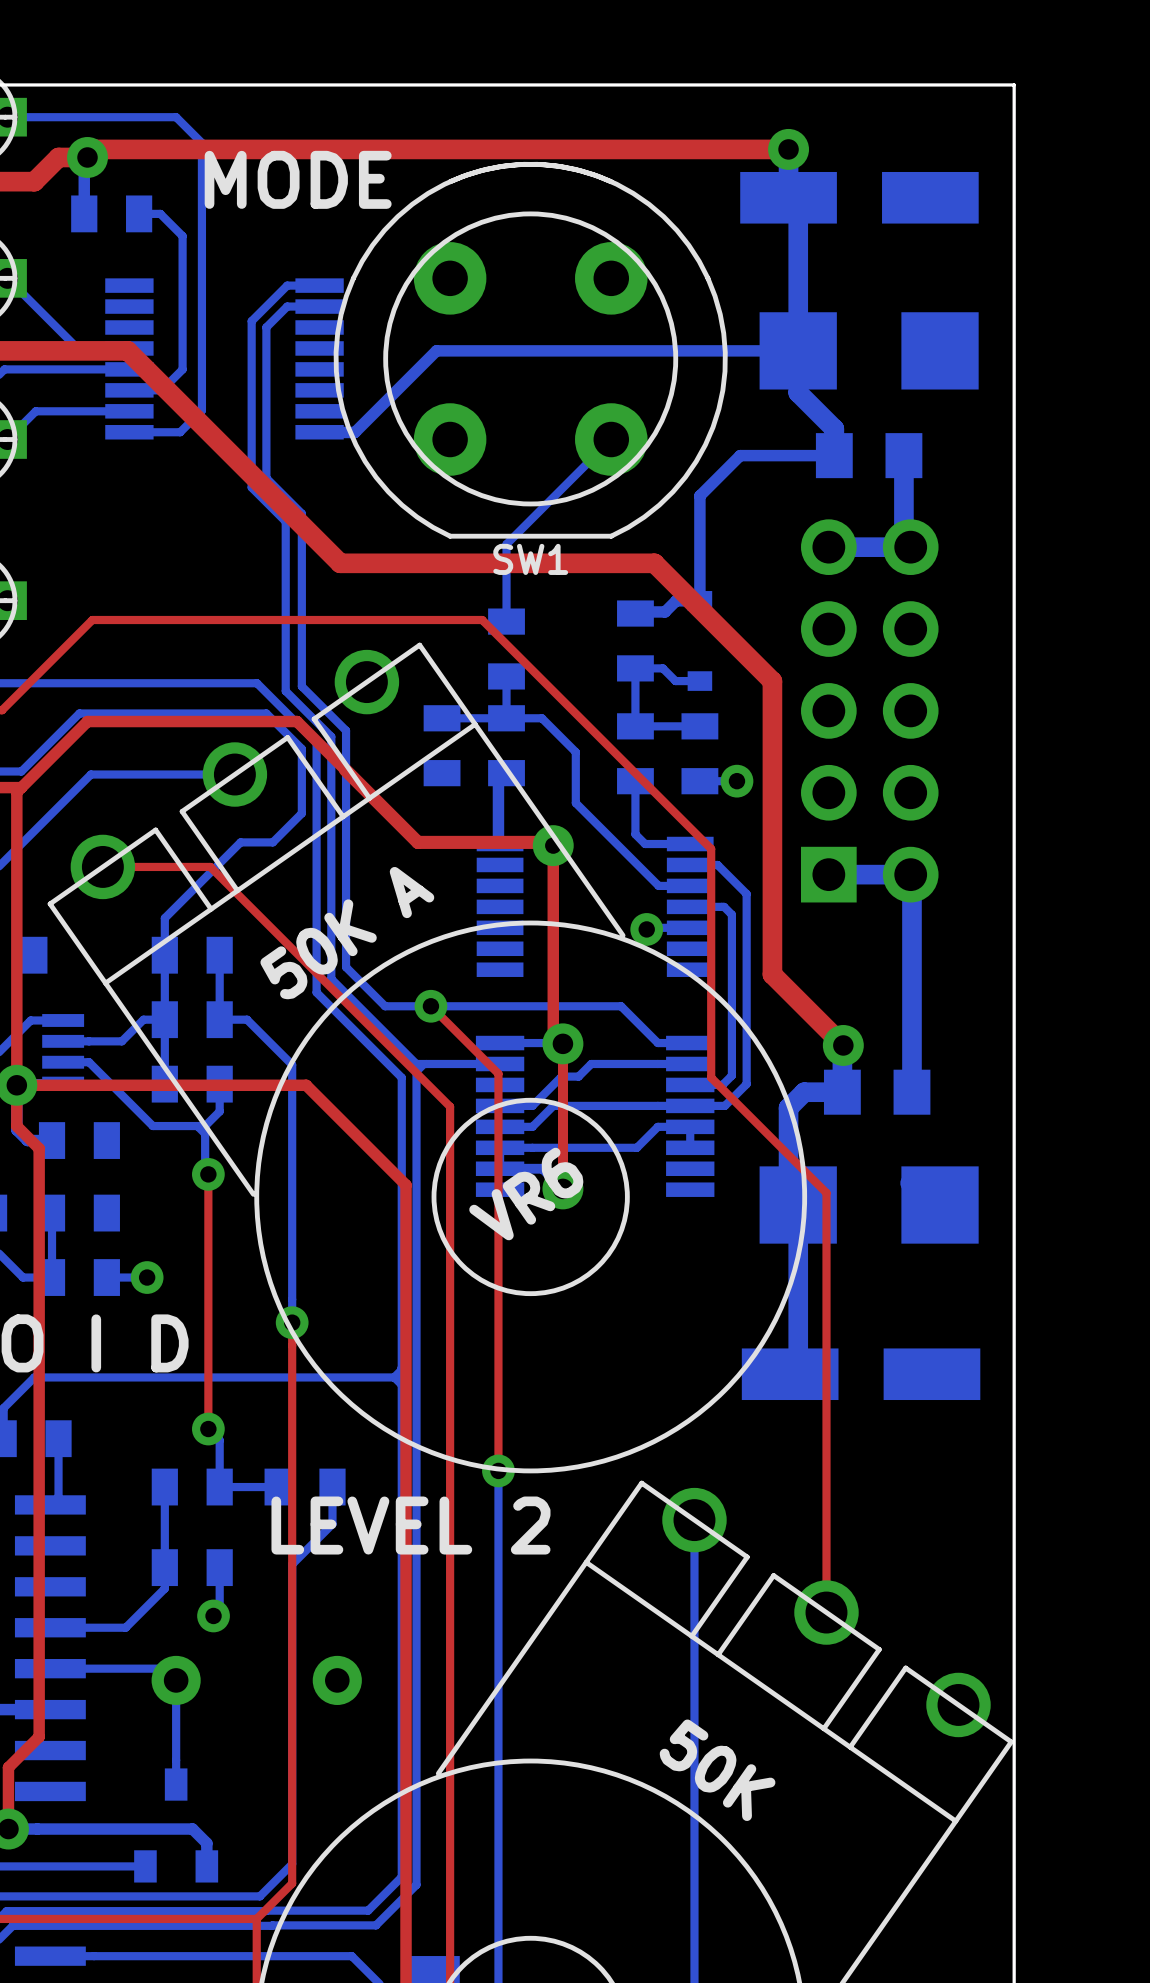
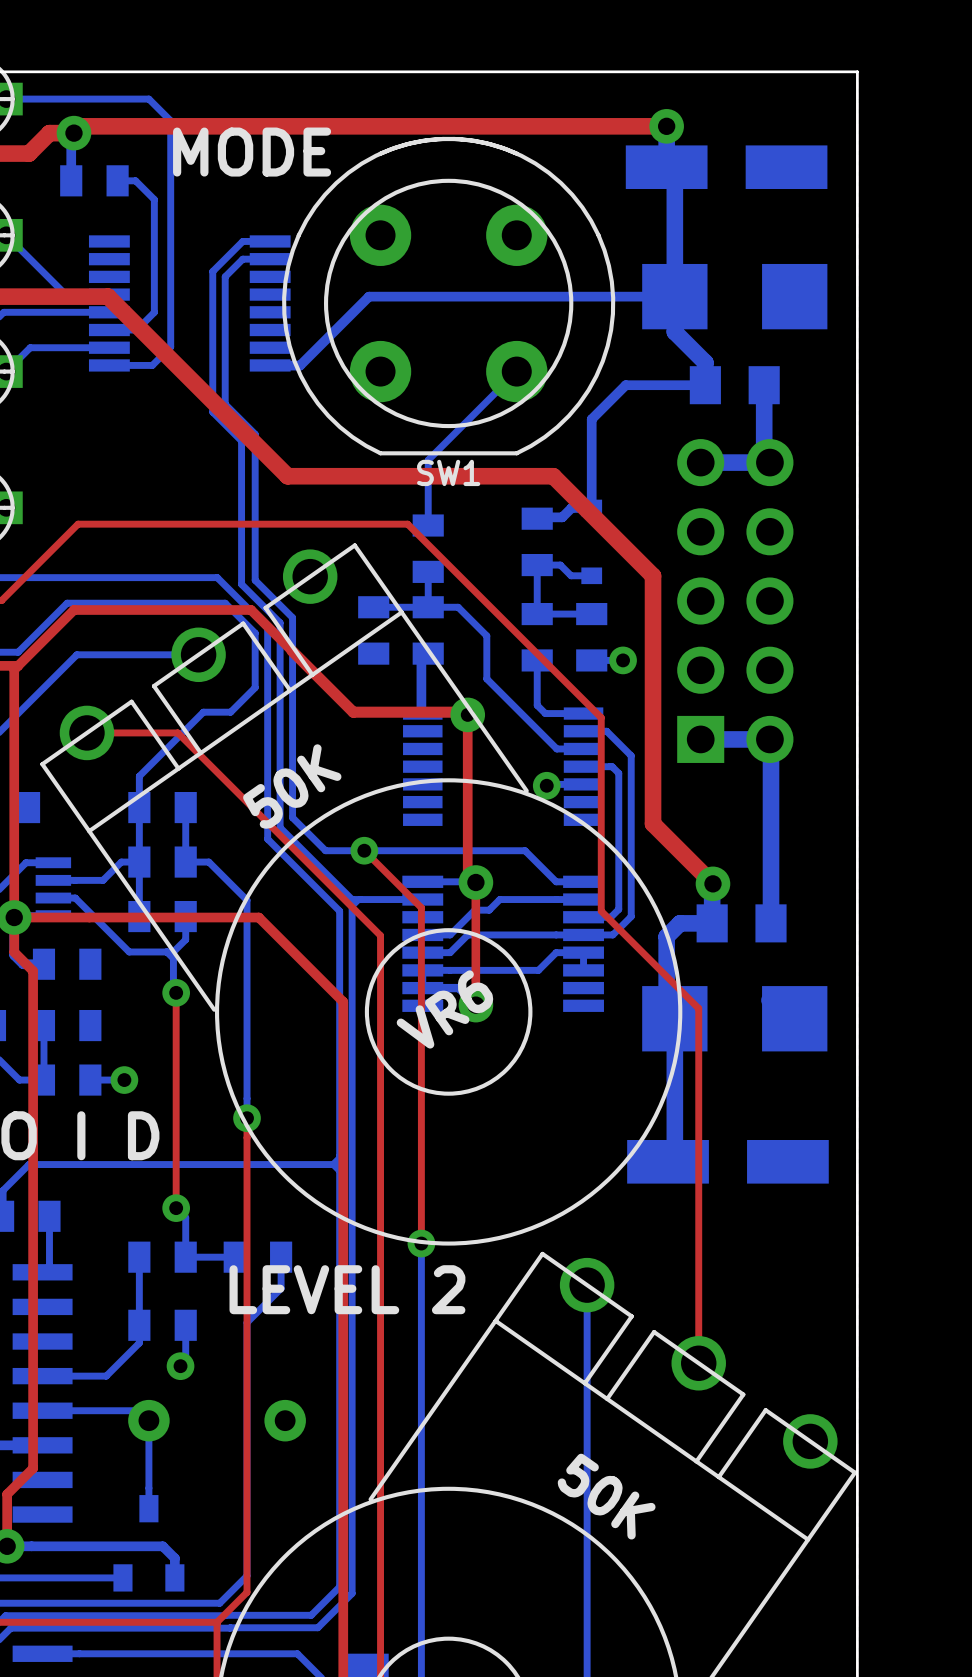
VR6 value: 50K A (347, 933) -> 50K (292, 786)

